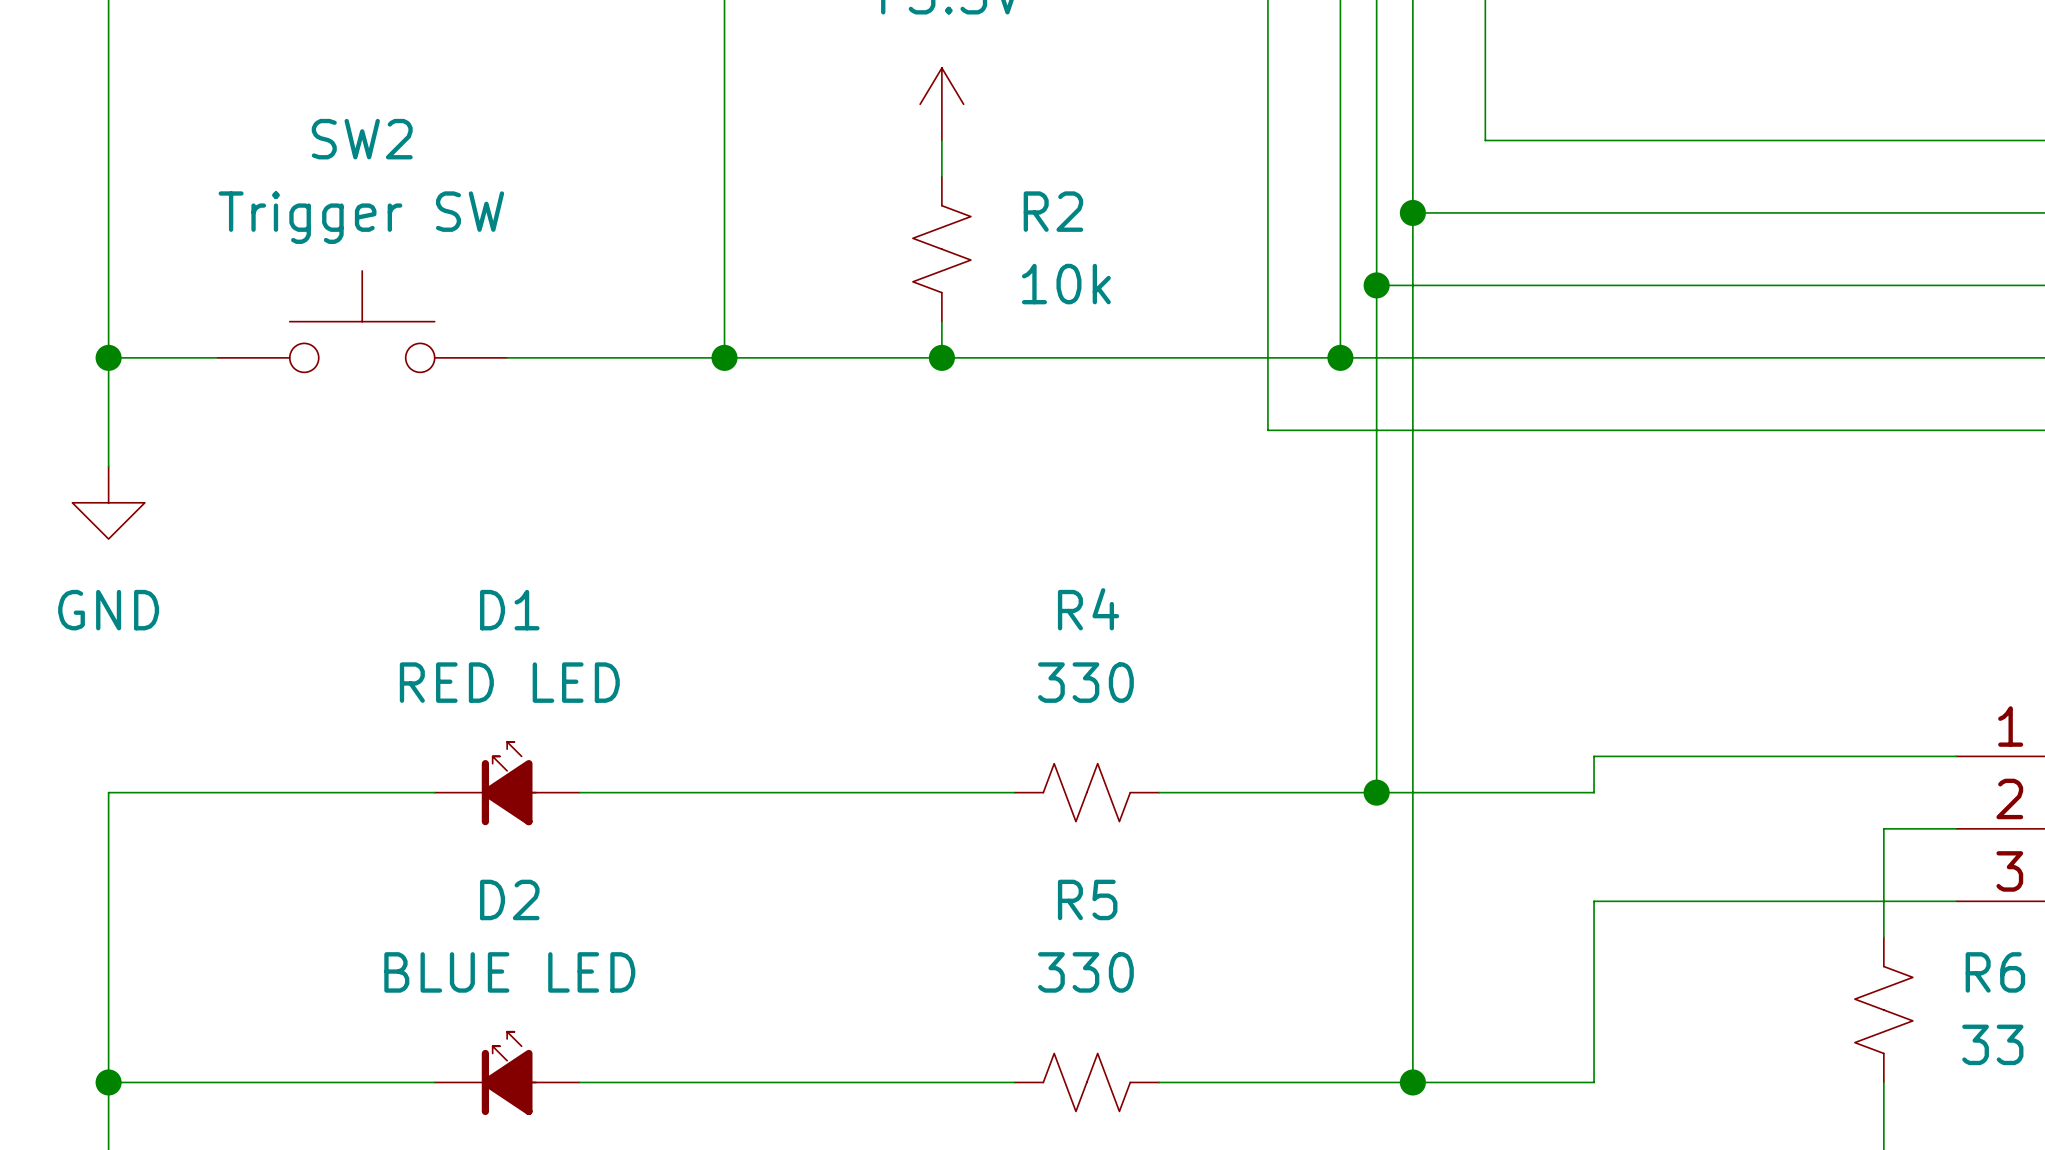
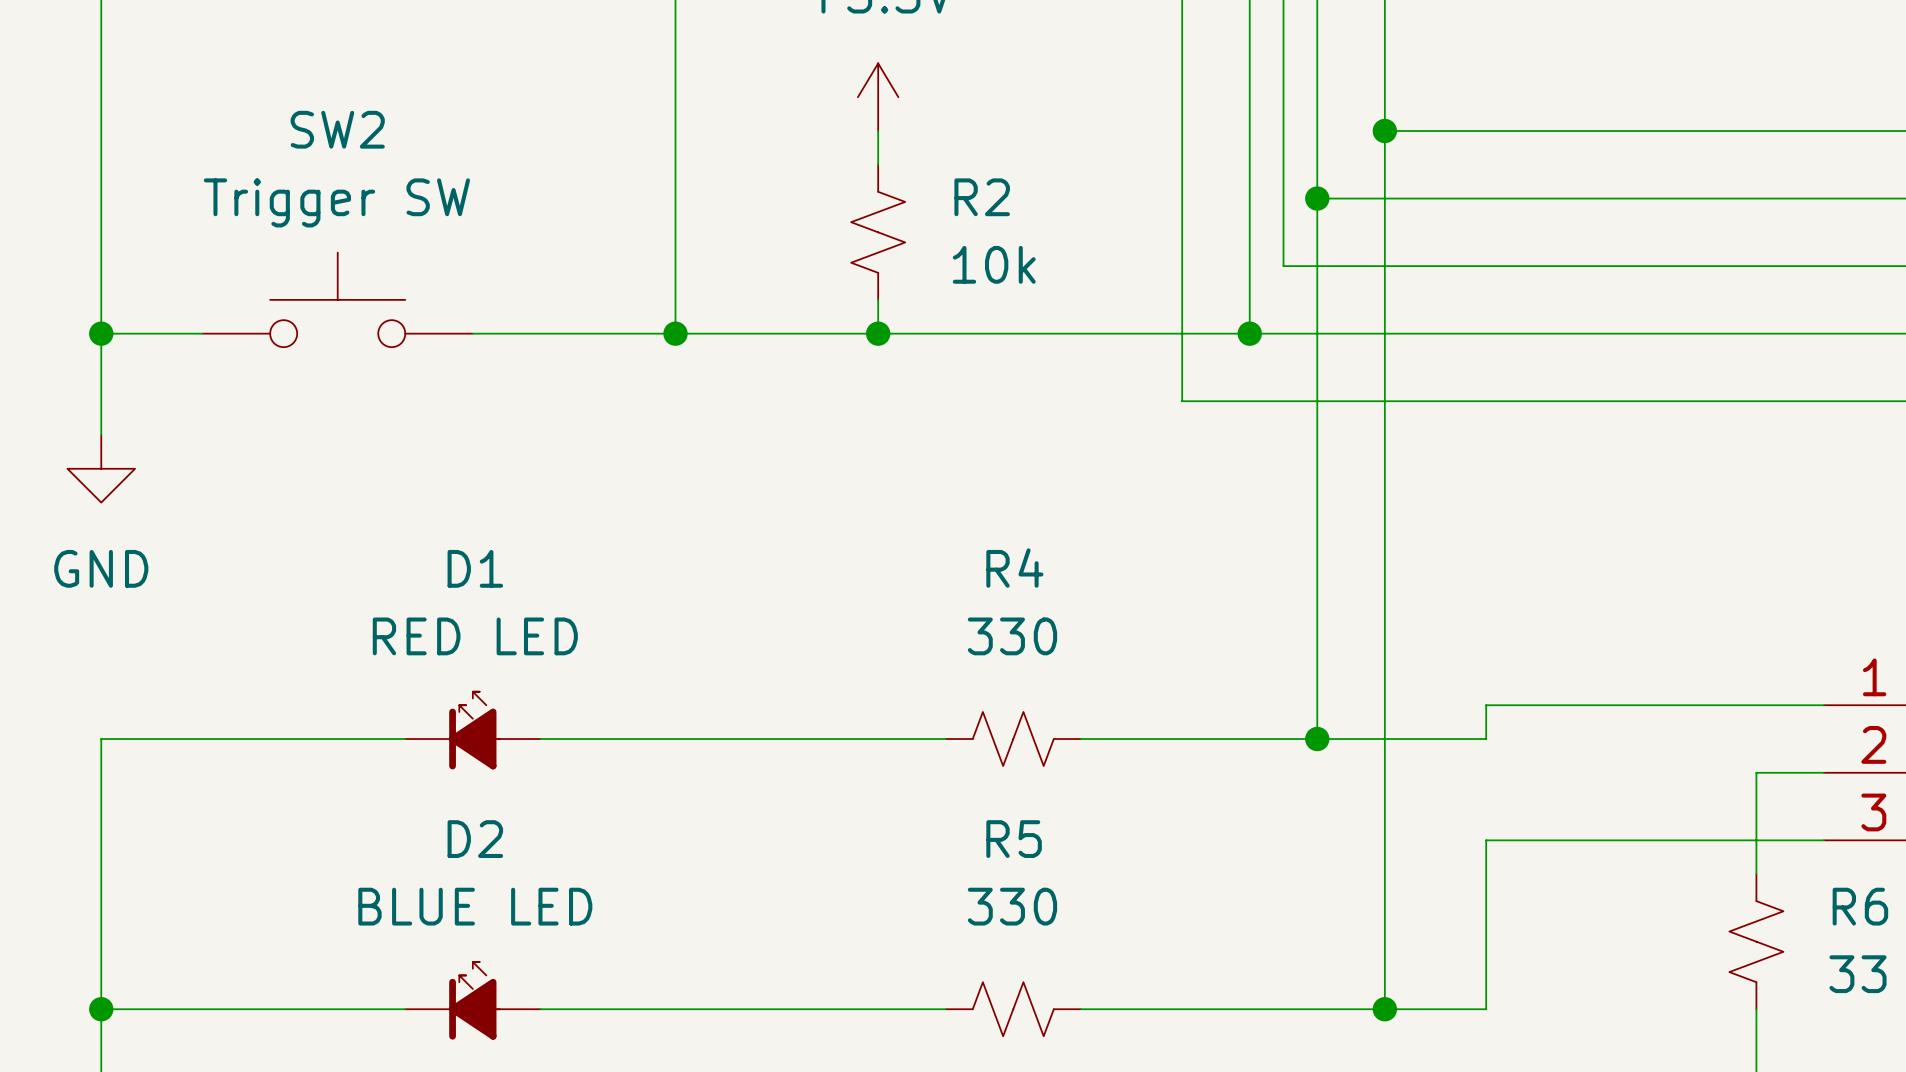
wire: none -> (1384, 130) (1384, 1009)
junction: none -> (1384, 130)
wire: (1376, 285) (1376, 792) -> none
junction: (1376, 285) -> none
junction position: (1376, 792) -> (1317, 739)
wire: (1412, 792) (1412, 1082) -> none
junction position: (1412, 1082) -> (1384, 1009)

